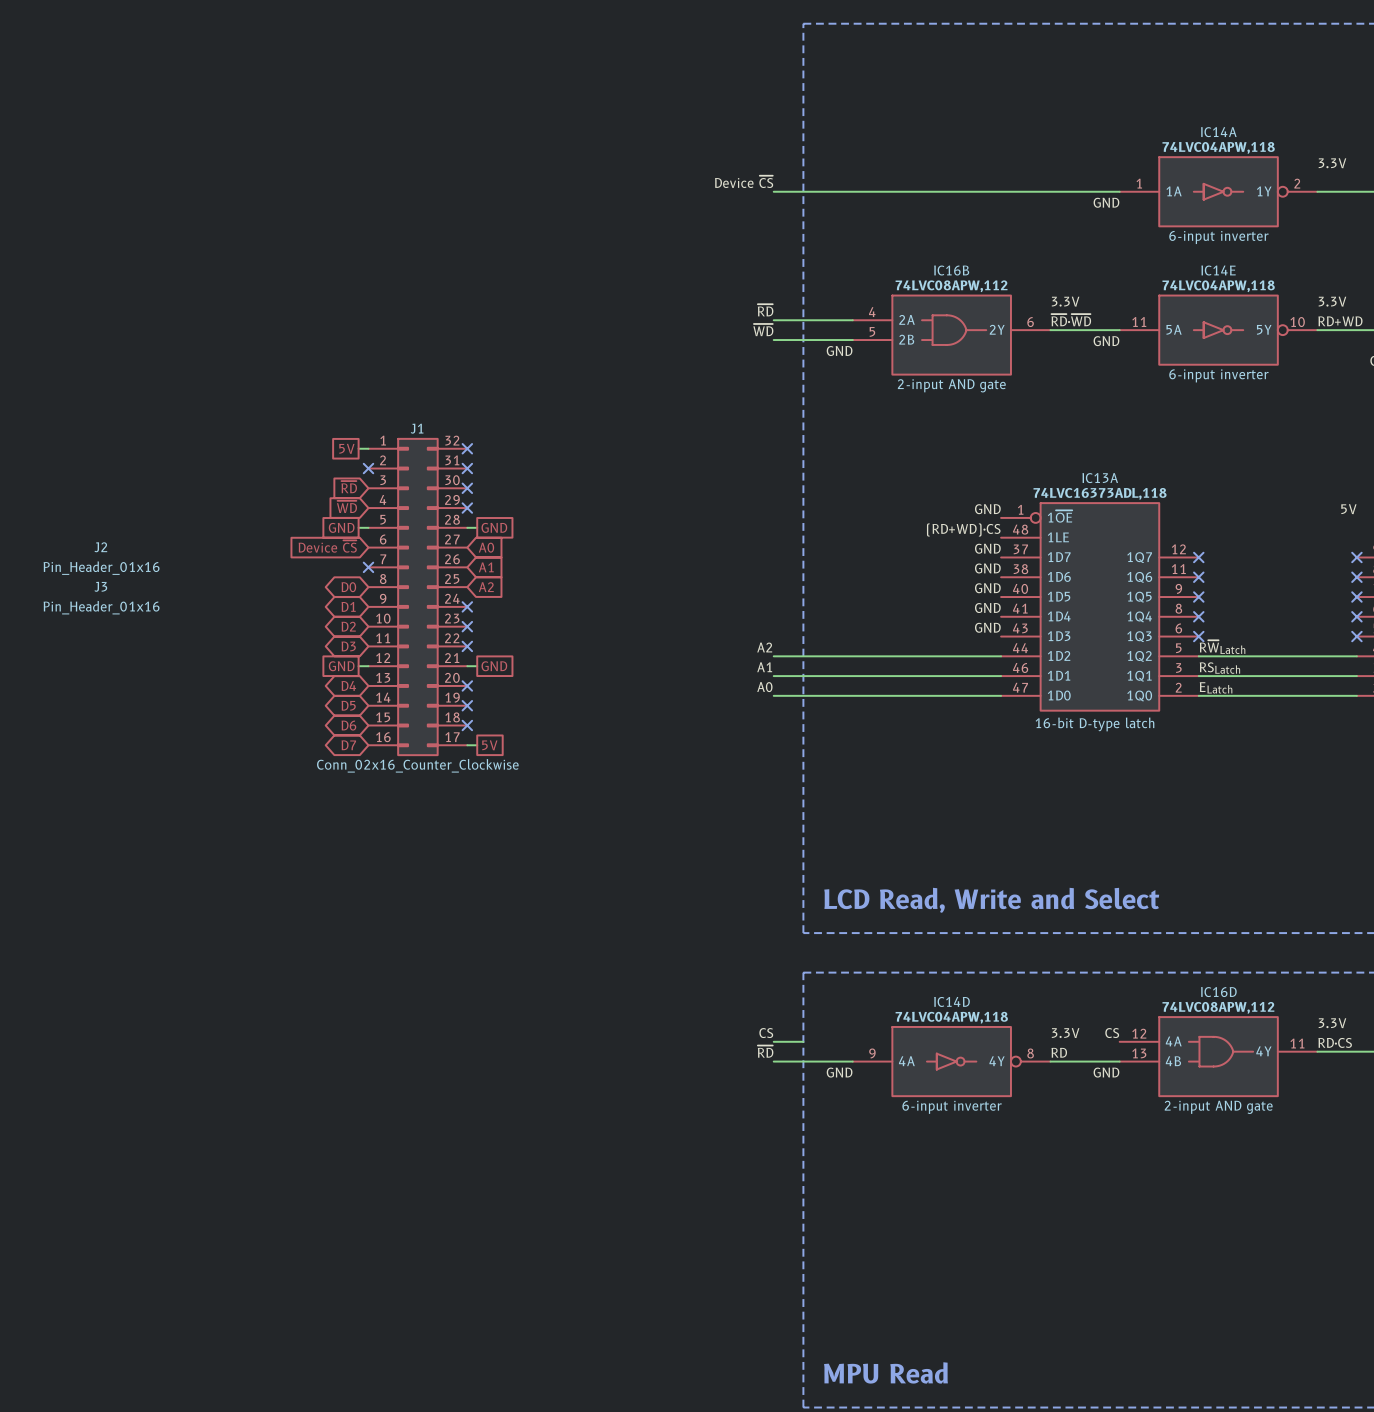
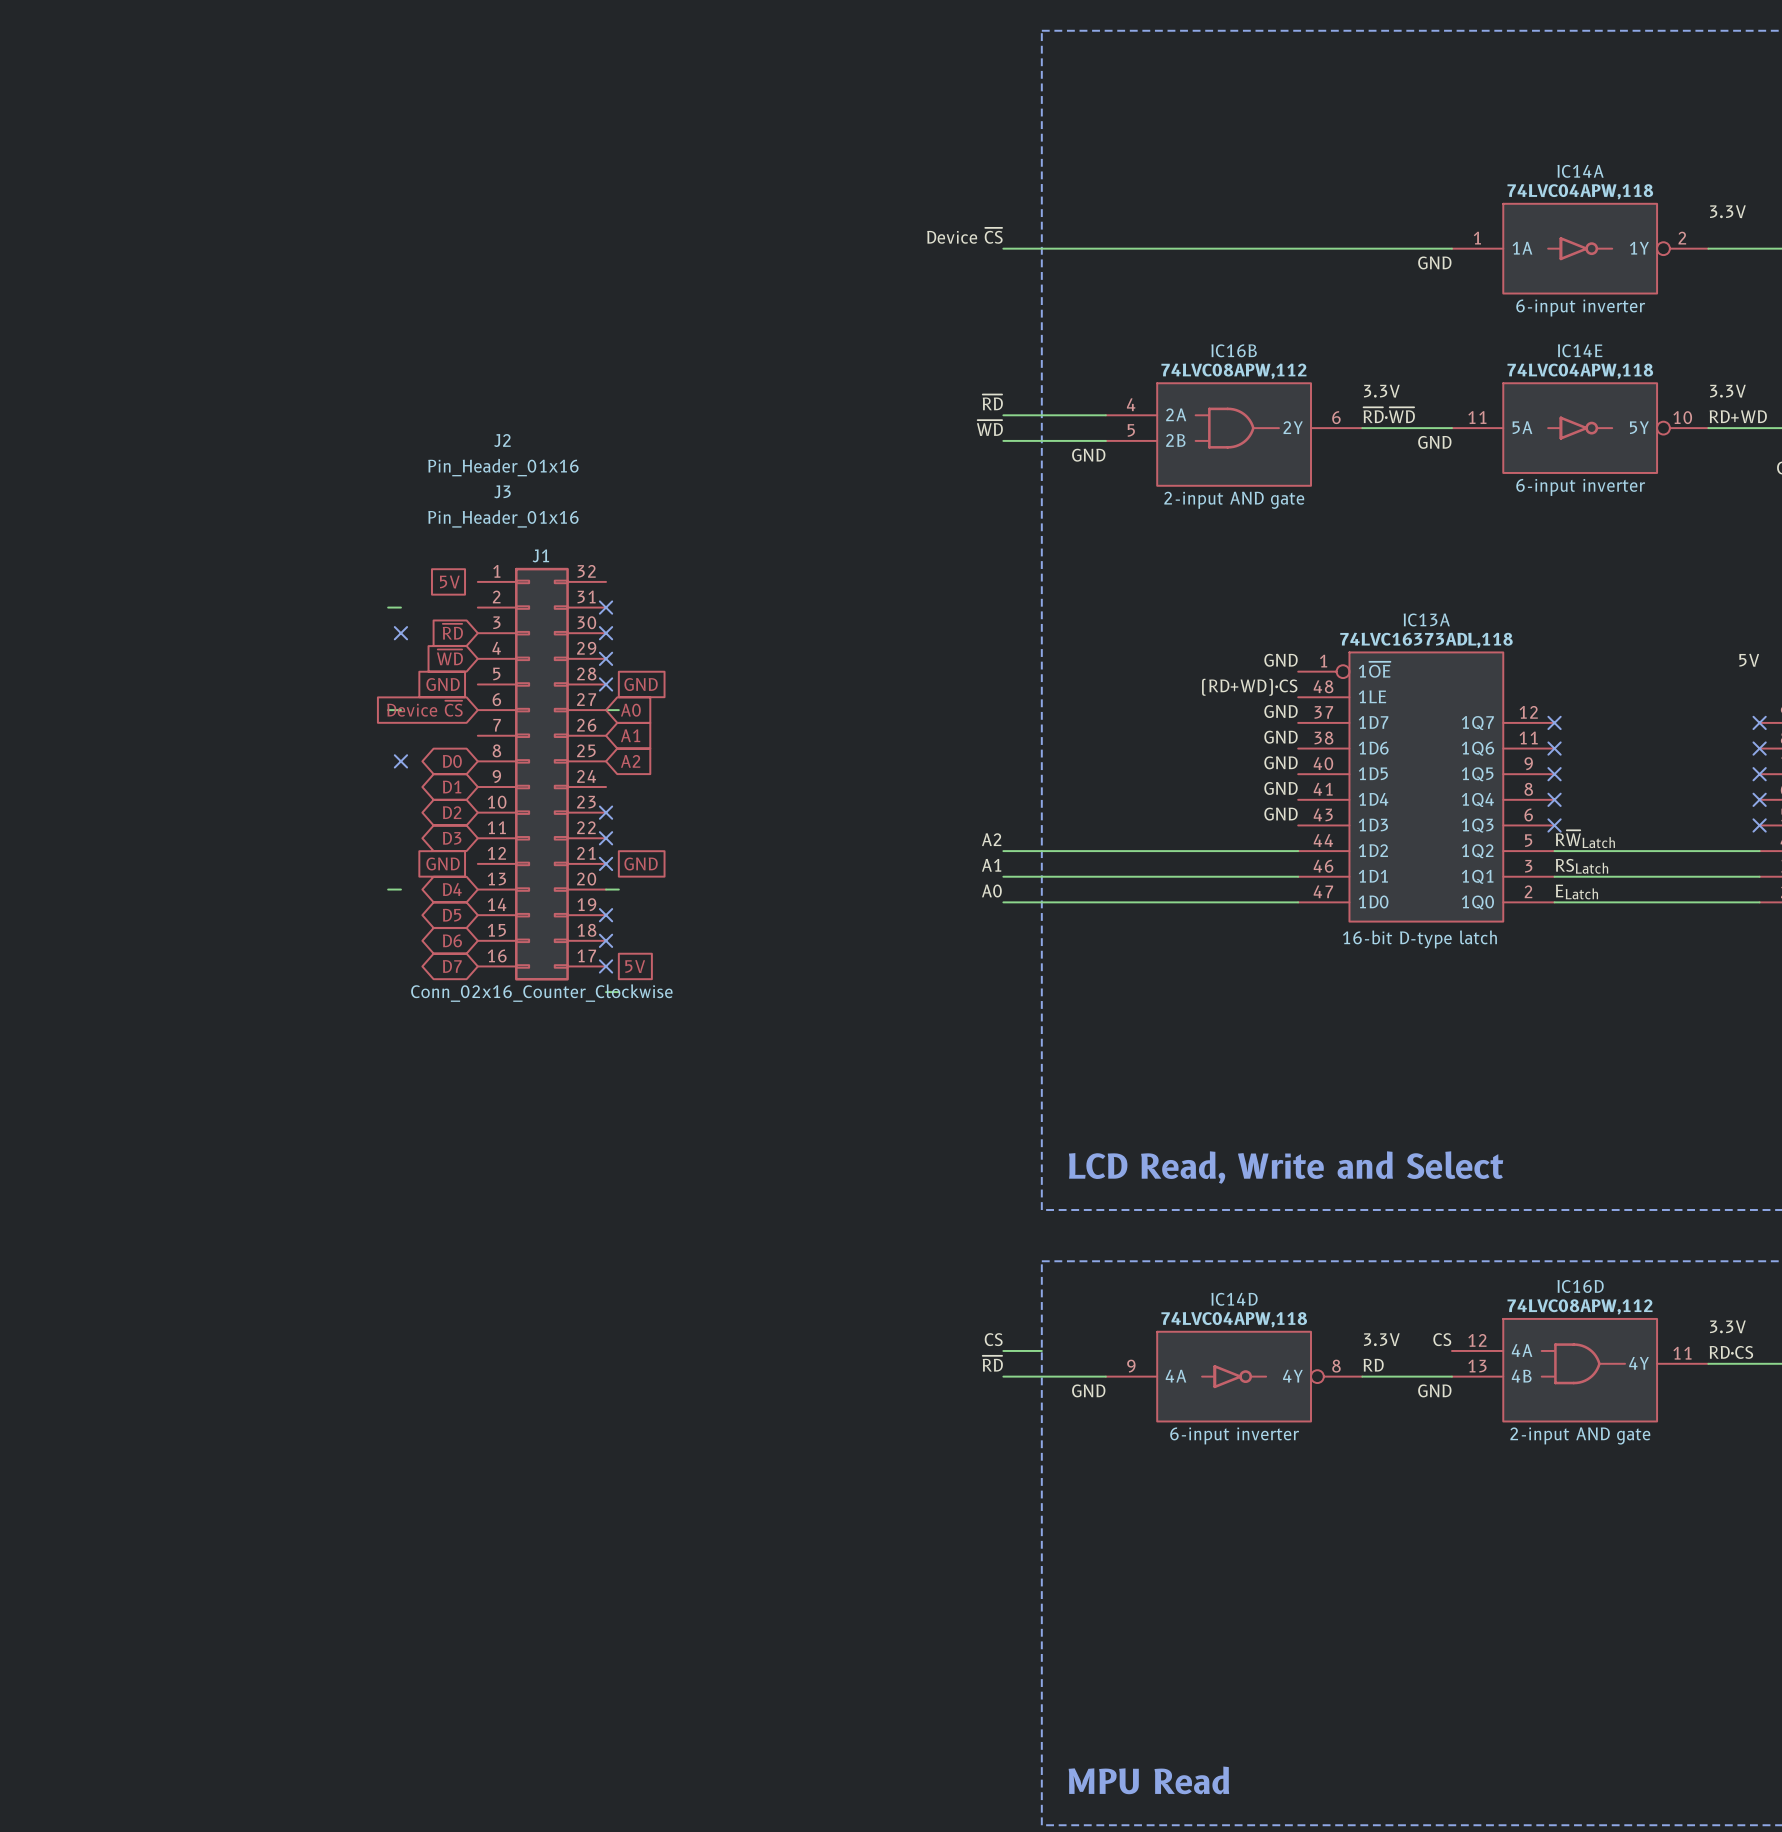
wire: (358, 448) (368, 448) -> (388, 607) (400, 607)
no-connect mark: (467, 448) -> none
no-connect mark: (368, 468) -> none
no-connect mark: none -> (400, 633)
wire: (358, 527) (368, 527) -> (388, 710) (400, 710)
wire: (467, 527) (477, 527) -> (606, 710) (618, 710)
no-connect mark: none -> (606, 684)
J2 position: (101, 558) -> (503, 455)
no-connect mark: (368, 567) -> none
no-connect mark: none -> (400, 761)
J3 position: (101, 598) -> (503, 506)
no-connect mark: (467, 606) -> none
wire: (358, 666) (368, 666) -> (388, 889) (400, 889)
wire: (467, 666) (477, 666) -> (606, 889) (618, 889)
no-connect mark position: (467, 685) -> (606, 863)
wire: (467, 745) (477, 745) -> (606, 992) (618, 992)
no-connect mark: none -> (606, 966)

